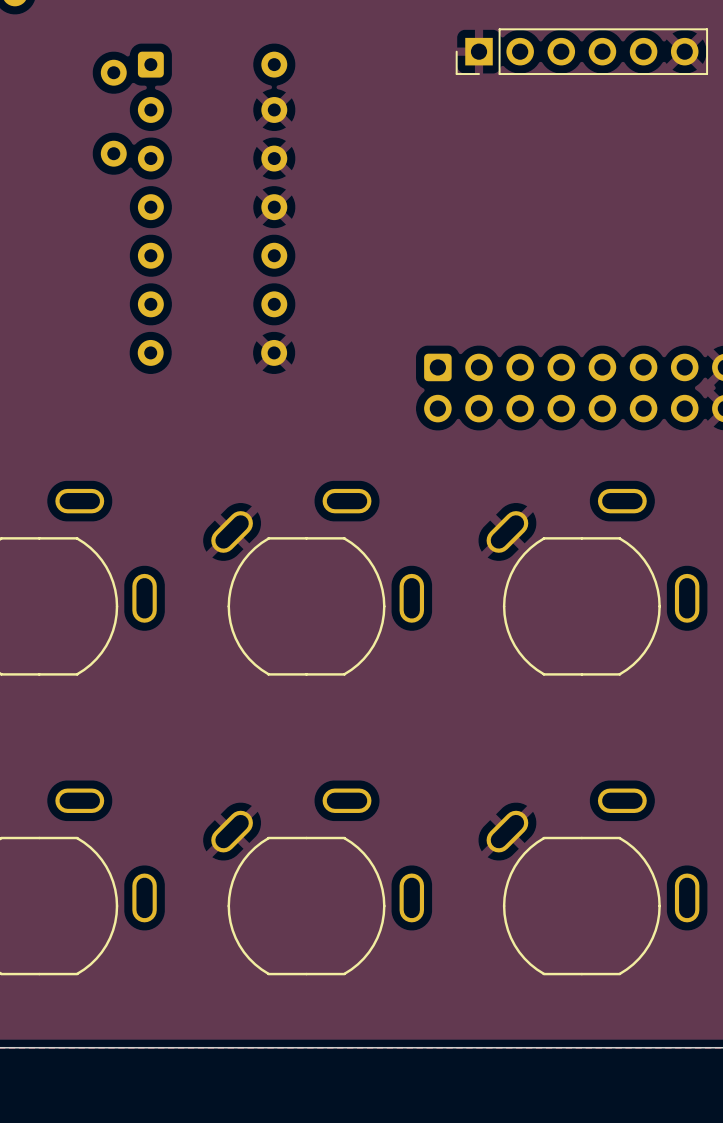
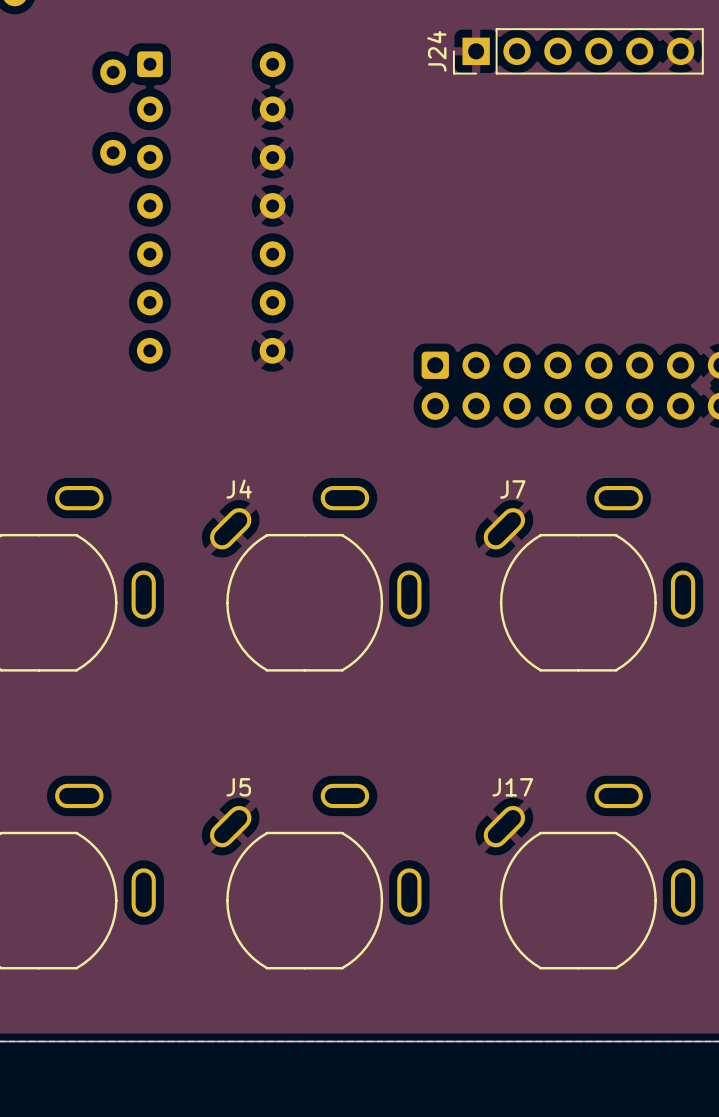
J24 name: none -> J24 (436, 51)
J4 name: none -> J4 (239, 489)
J7 name: none -> J7 (512, 489)
J5 name: none -> J5 (238, 787)
J17 name: none -> J17 (512, 787)

